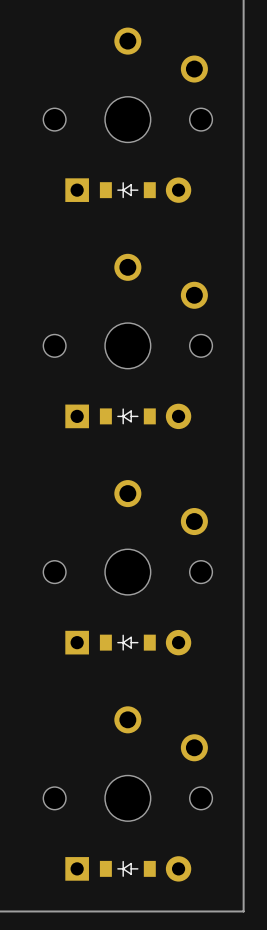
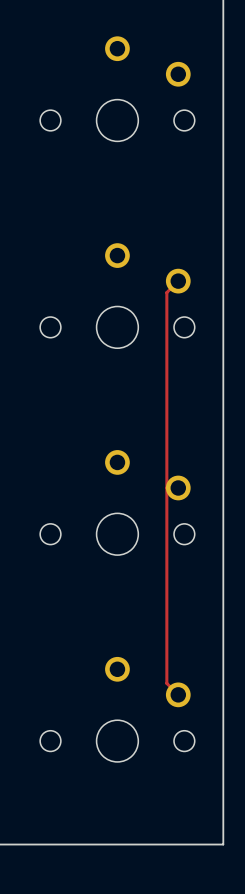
part: (128, 190) -> none
track: none -> (178, 281) (166, 292) (166, 683) (178, 694)
part: (128, 416) -> none
part: (128, 642) -> none
part: (128, 868) -> none

